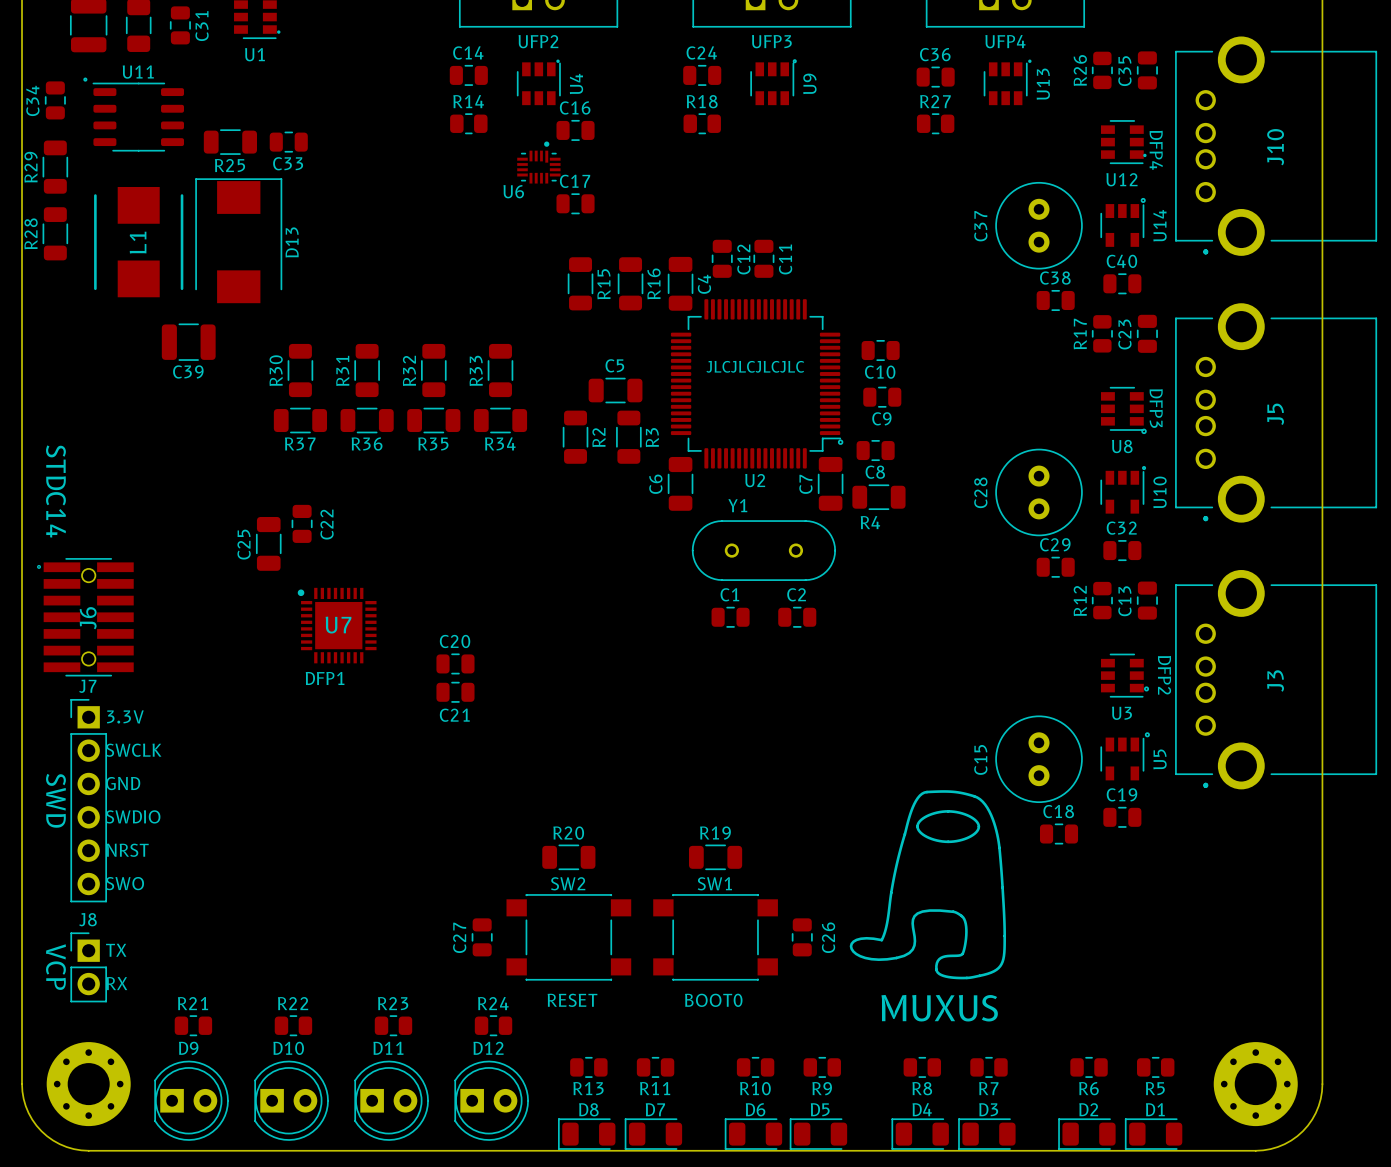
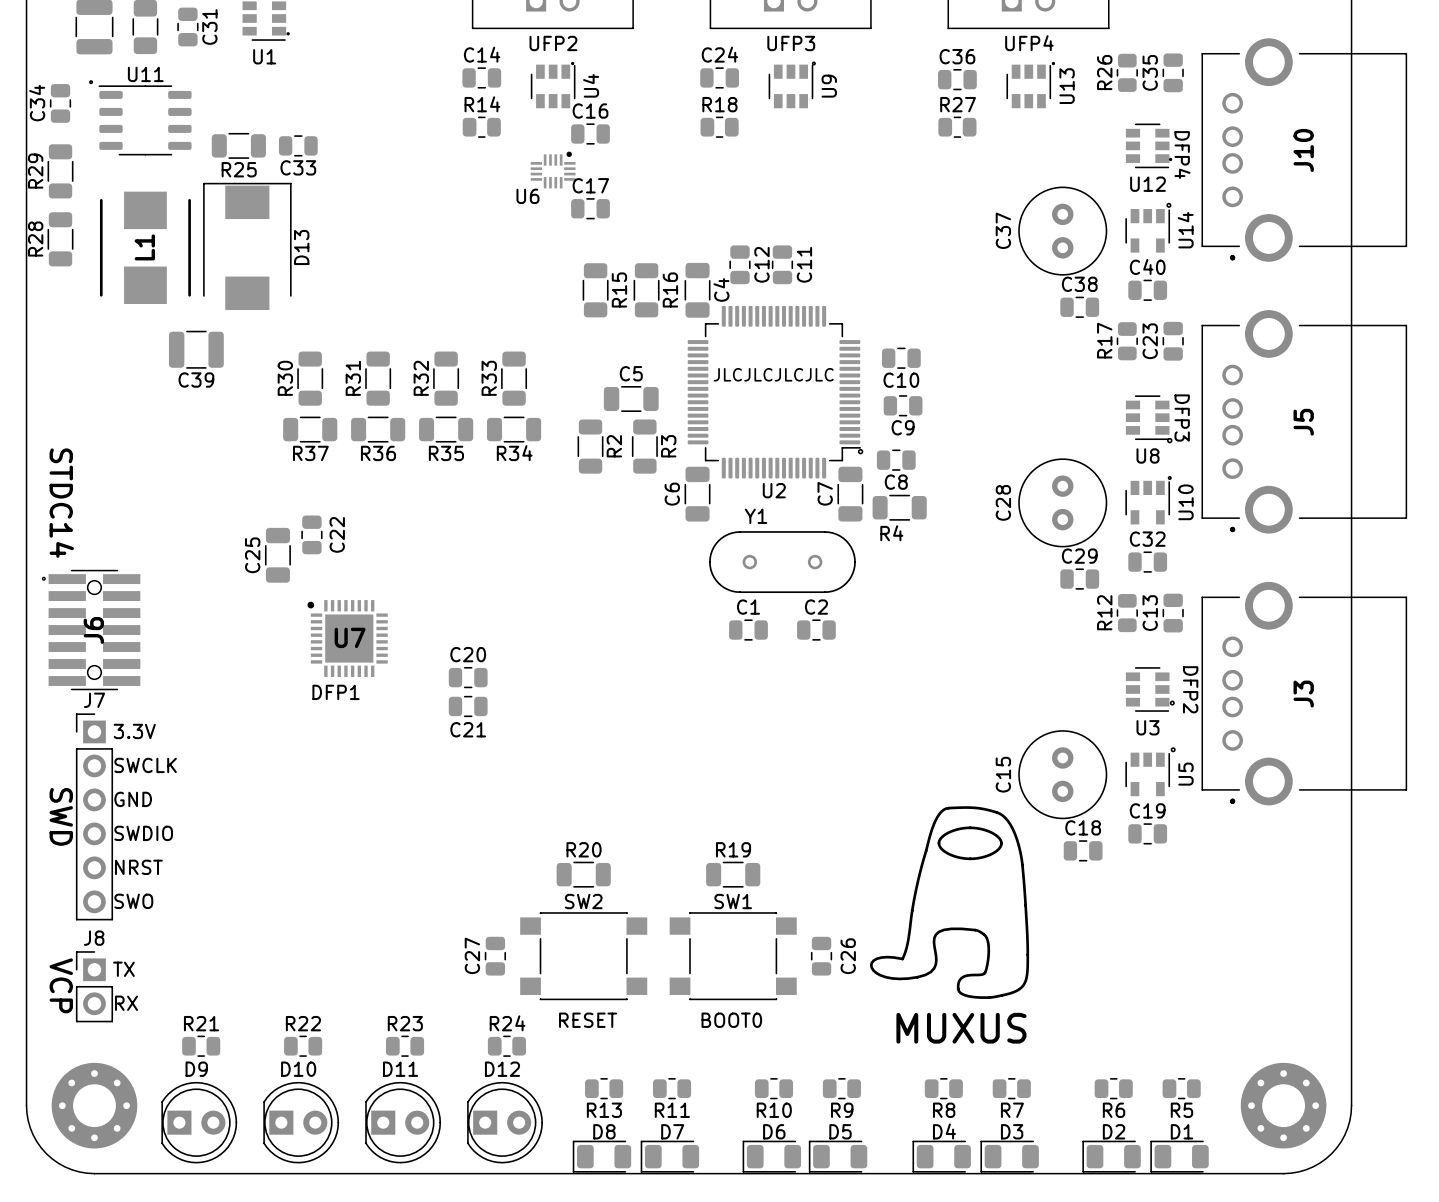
U6 footprint: [517, 141, 561, 184] -> [530, 151, 576, 189]

